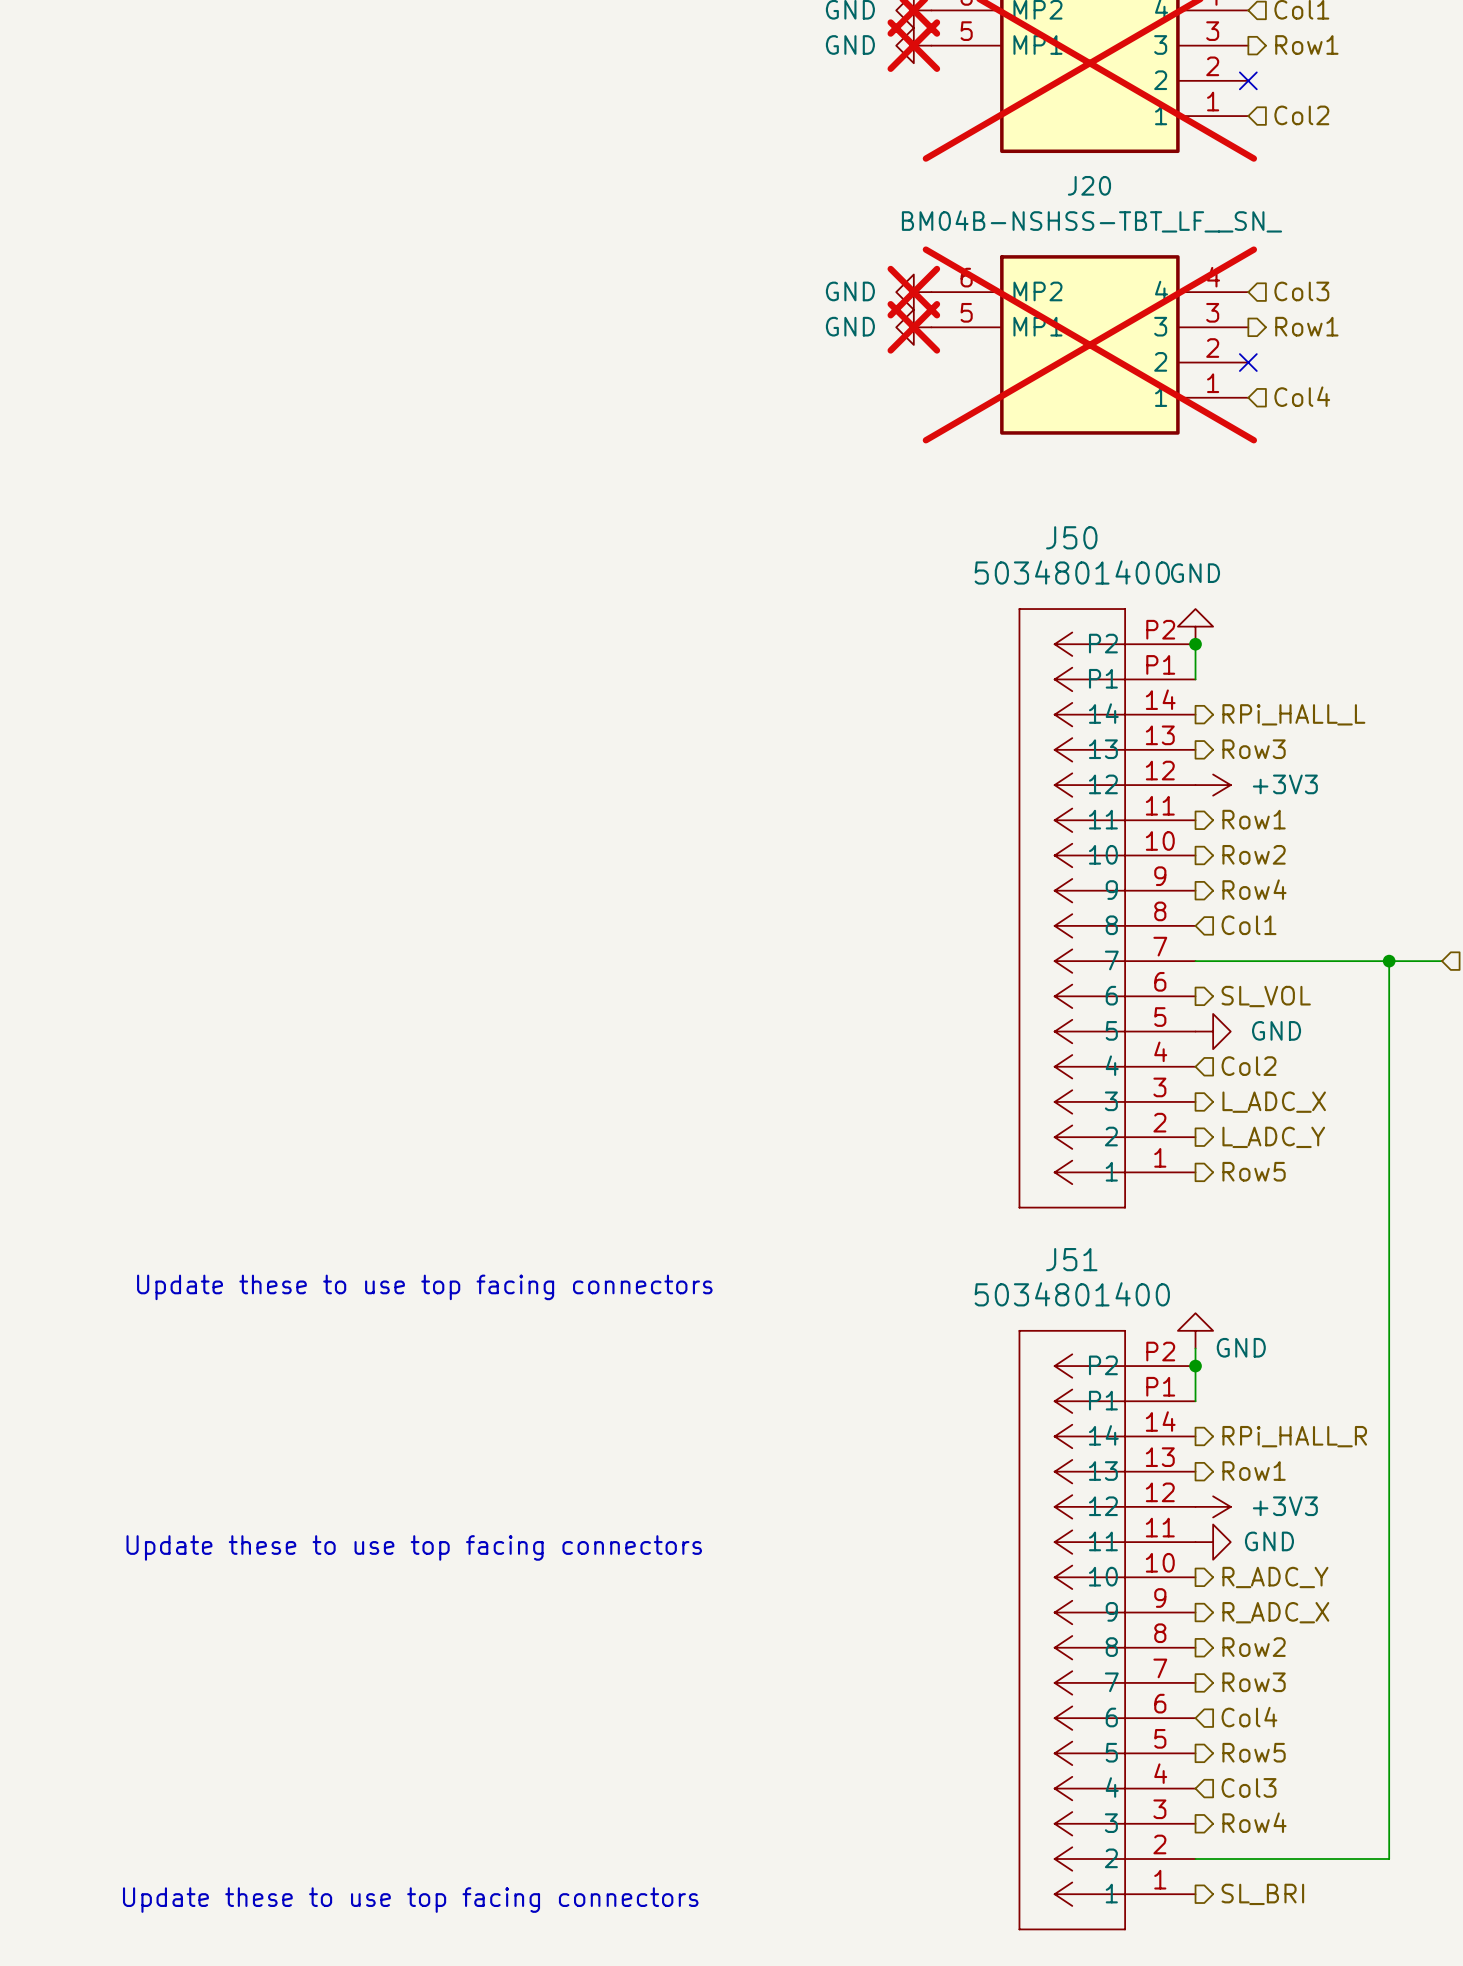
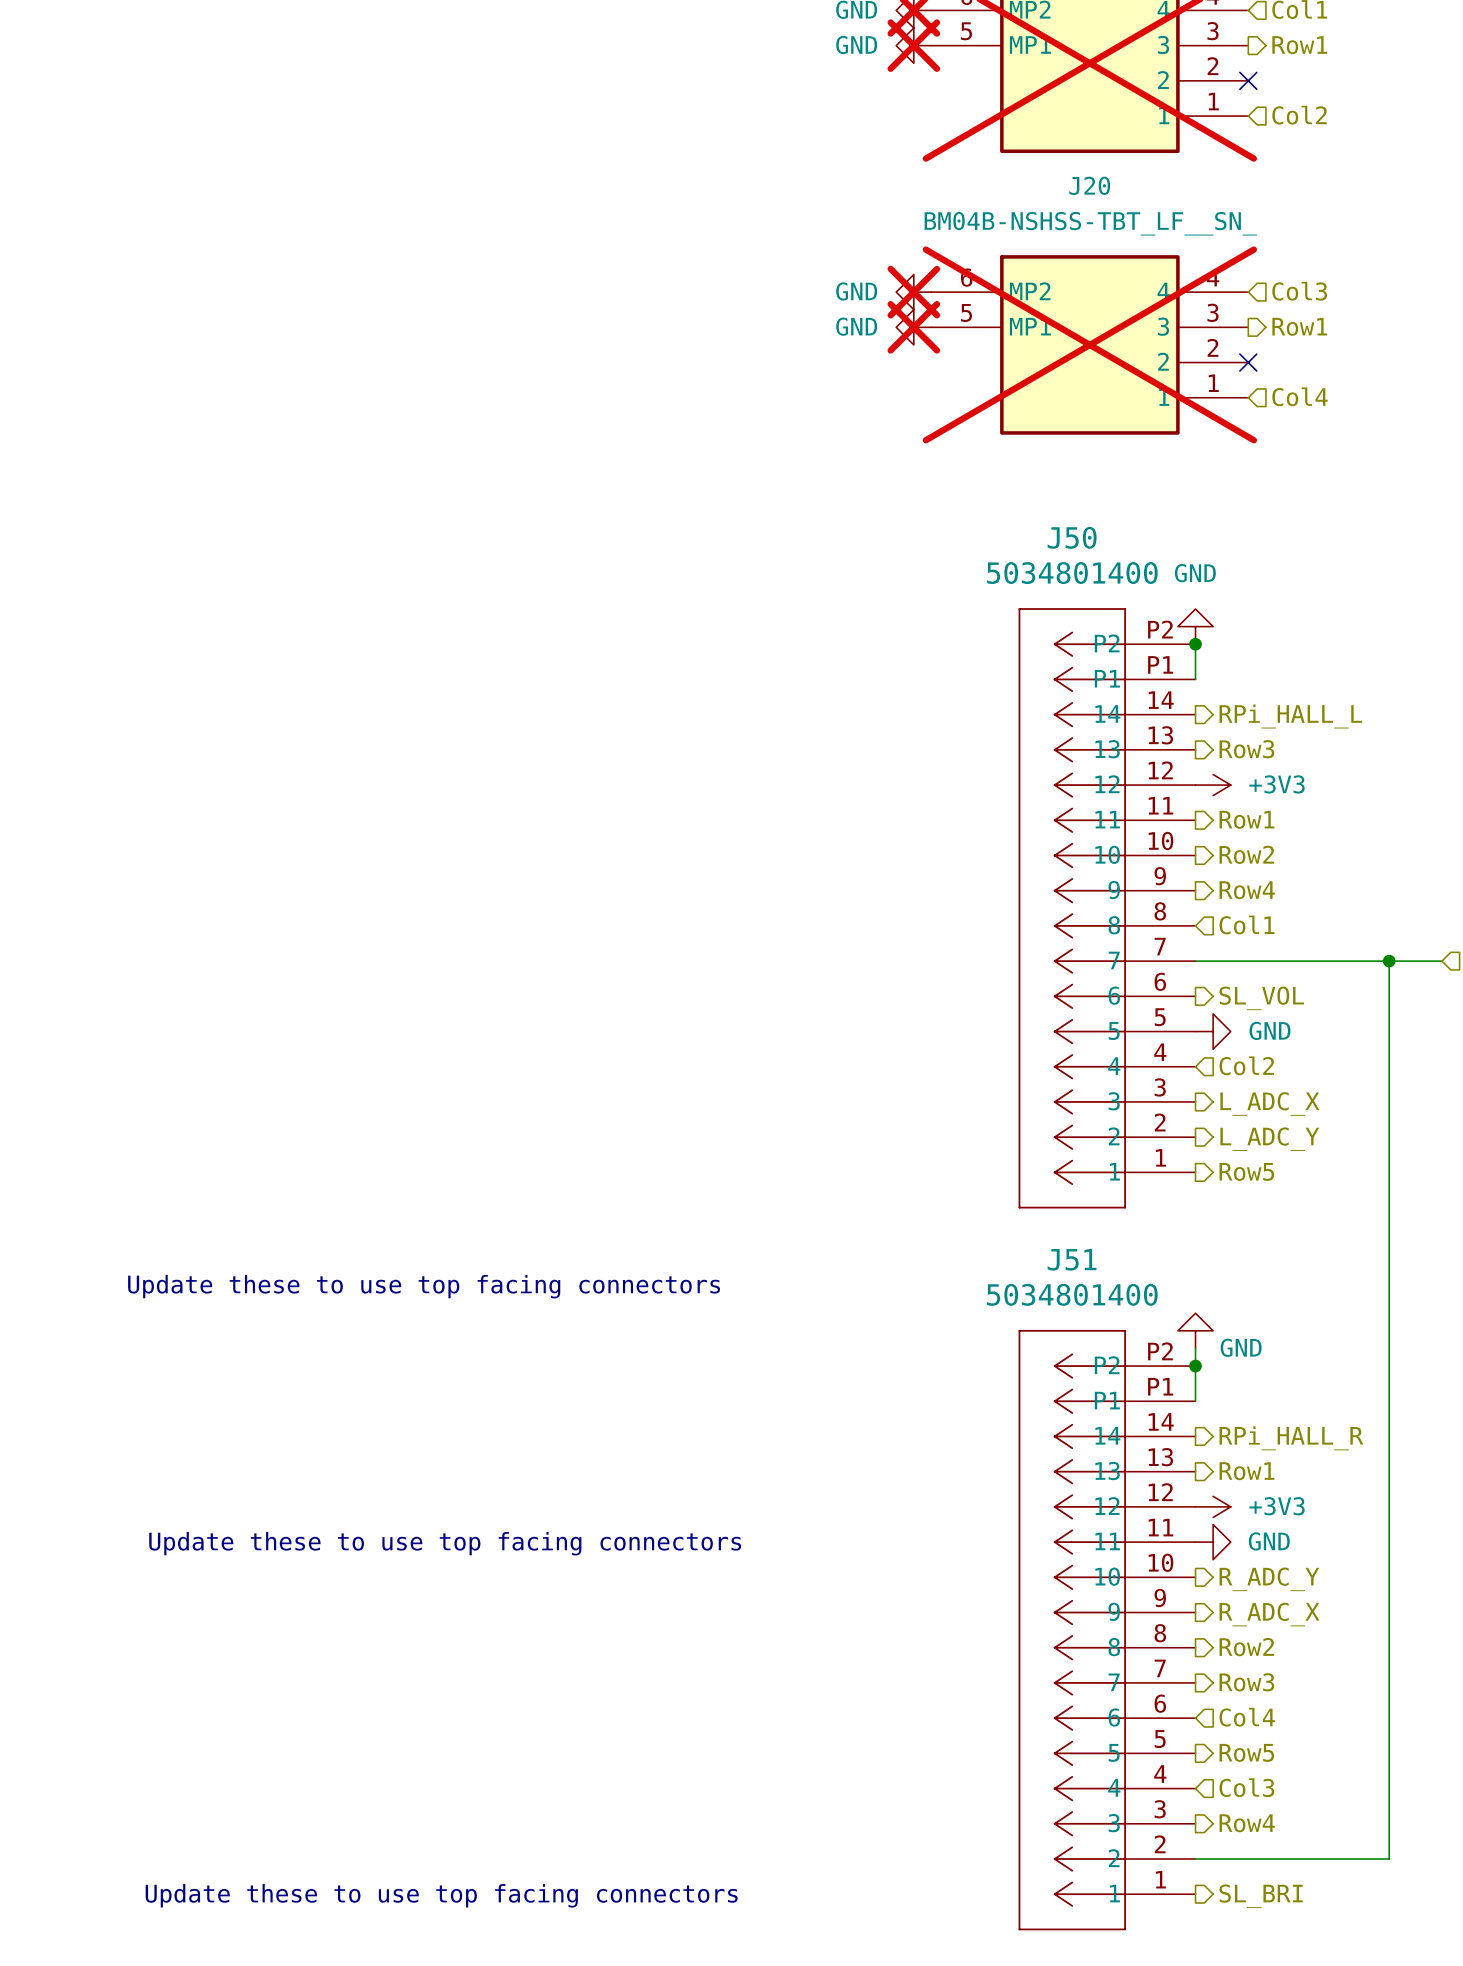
text position: Update these to use top facing connectors (414, 1547) -> Update these to use top facing connectors (445, 1543)
text position: Update these to use top facing connectors (410, 1900) -> Update these to use top facing connectors (441, 1895)

